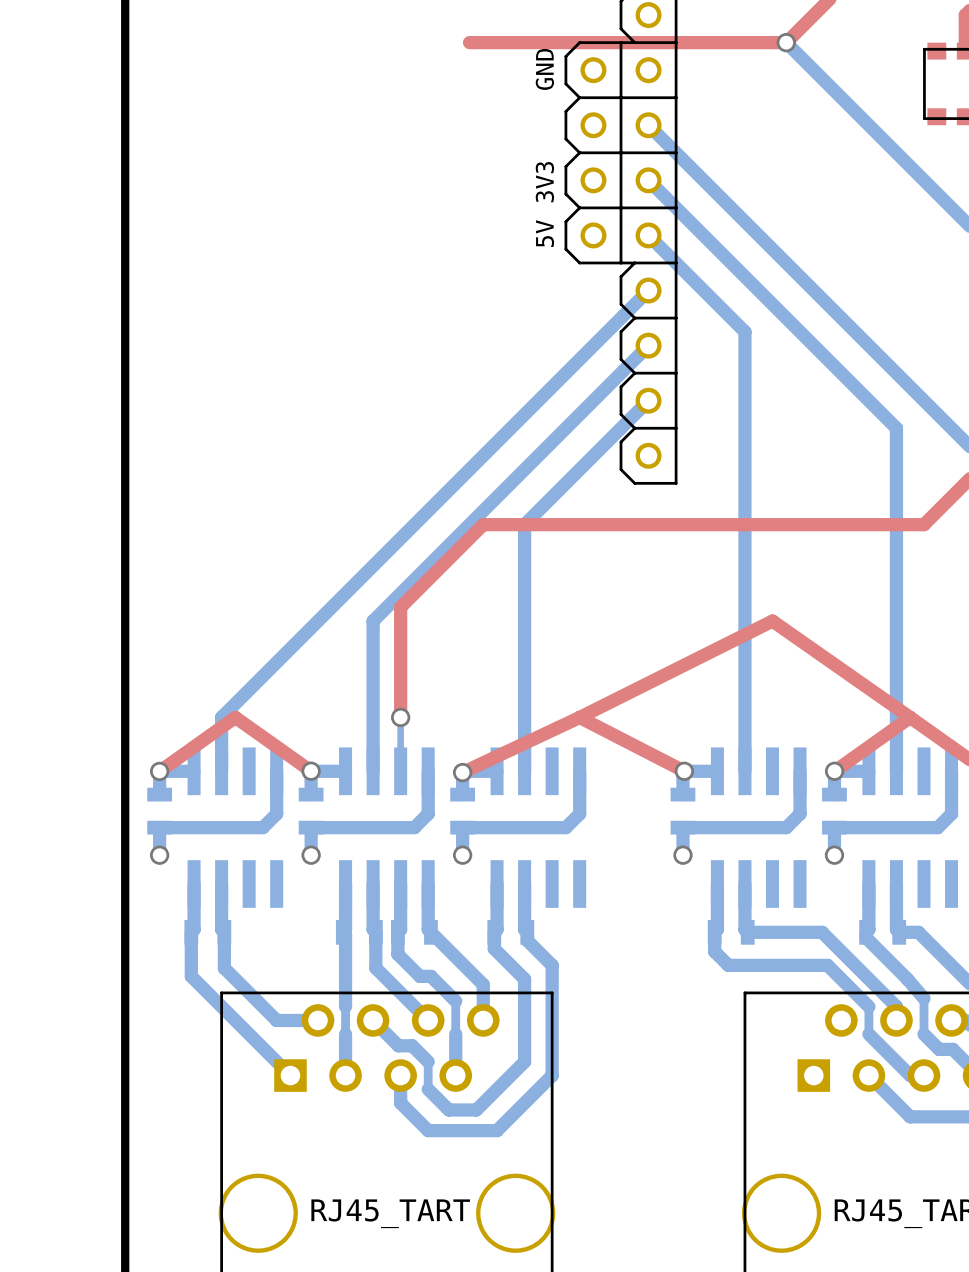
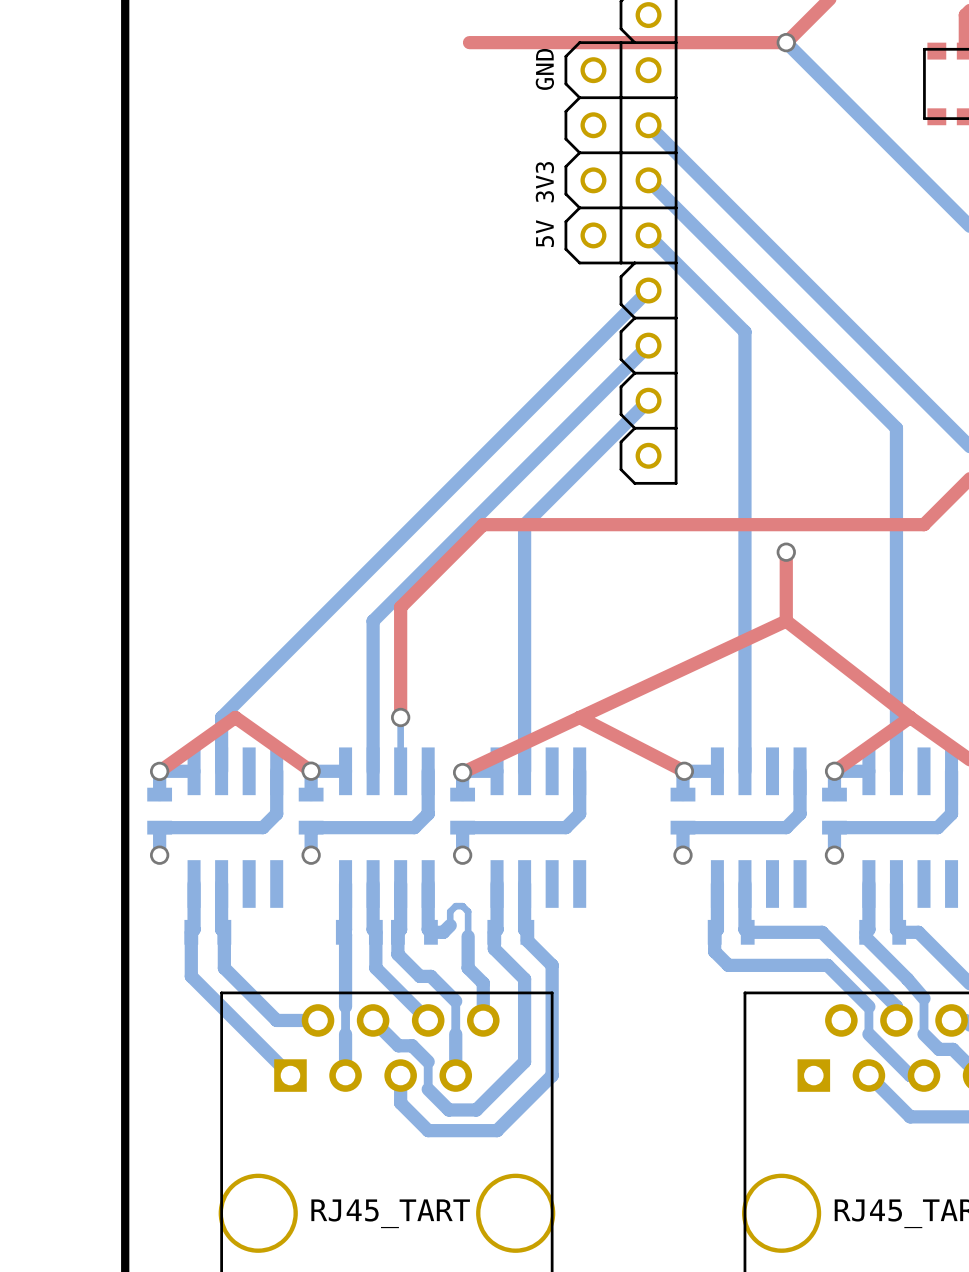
top track: none -> (786, 552) (786, 621)
via: none -> (786, 552)
top track: none -> (786, 621) (910, 717)
top track: (579, 717) (772, 621) (910, 717) -> (579, 717) (786, 621)
bottom track: (430, 932) (483, 984) -> (430, 932) (443, 932) (450, 925) (450, 911) (455, 906) (462, 906) (468, 911) (468, 968) (483, 984)

